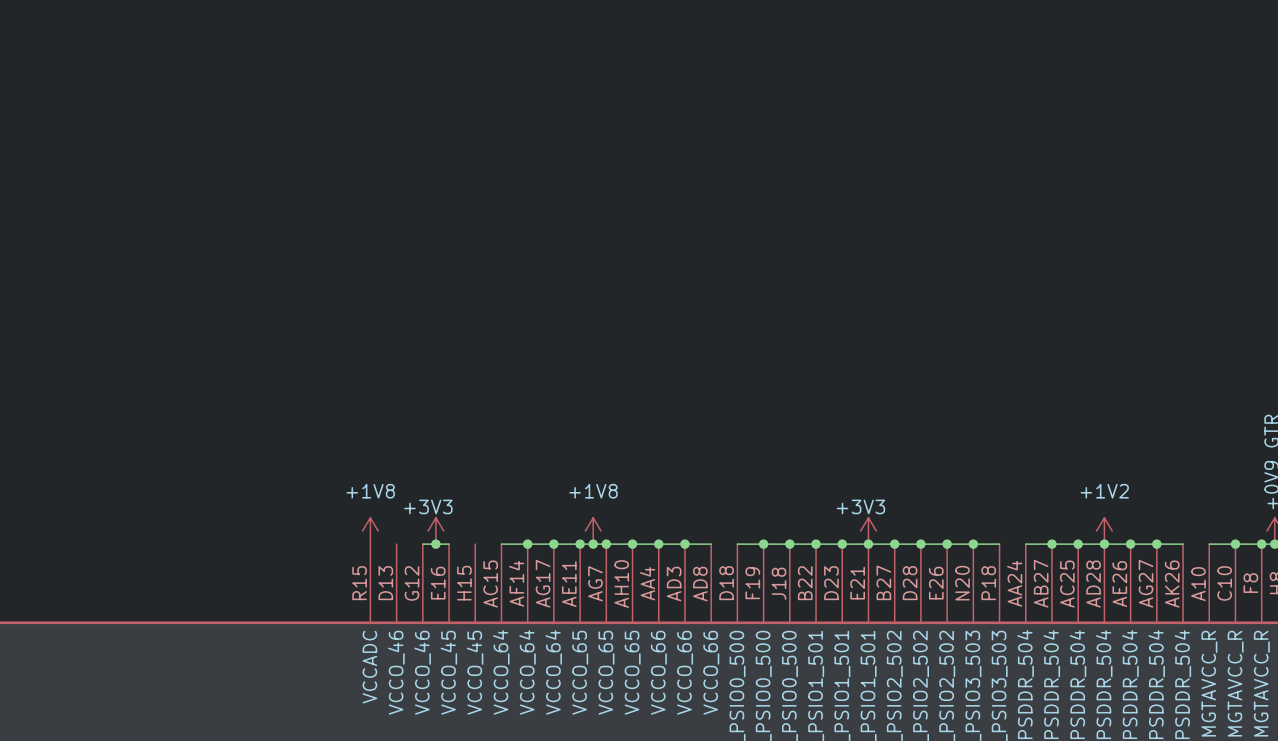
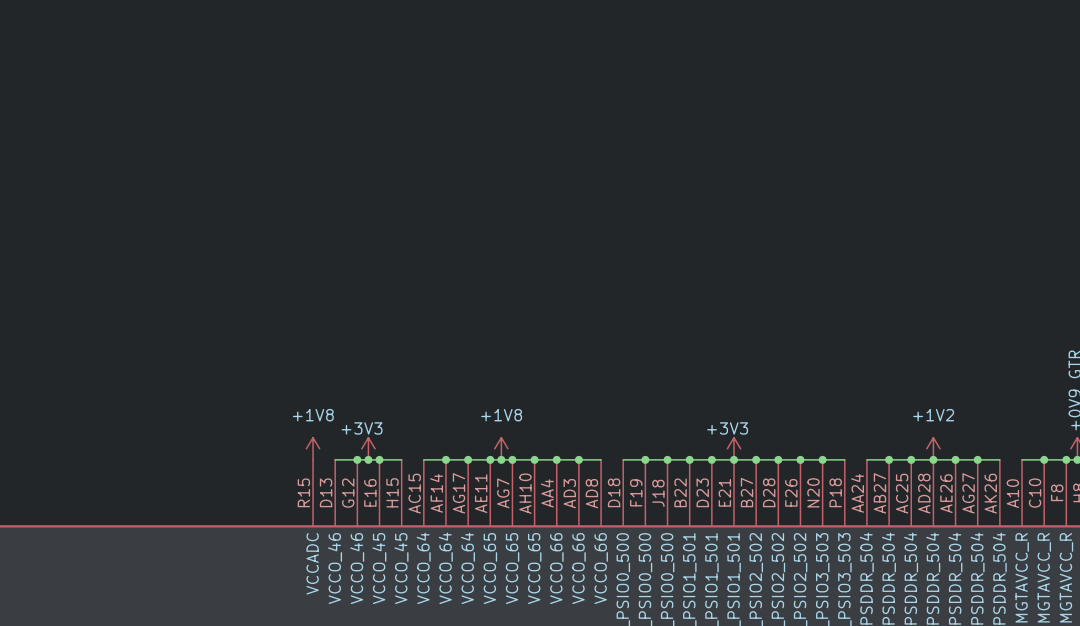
wire: none -> (335, 459) (357, 459)
junction: none -> (357, 459)
wire: none -> (379, 459) (401, 459)
junction: none -> (379, 459)

